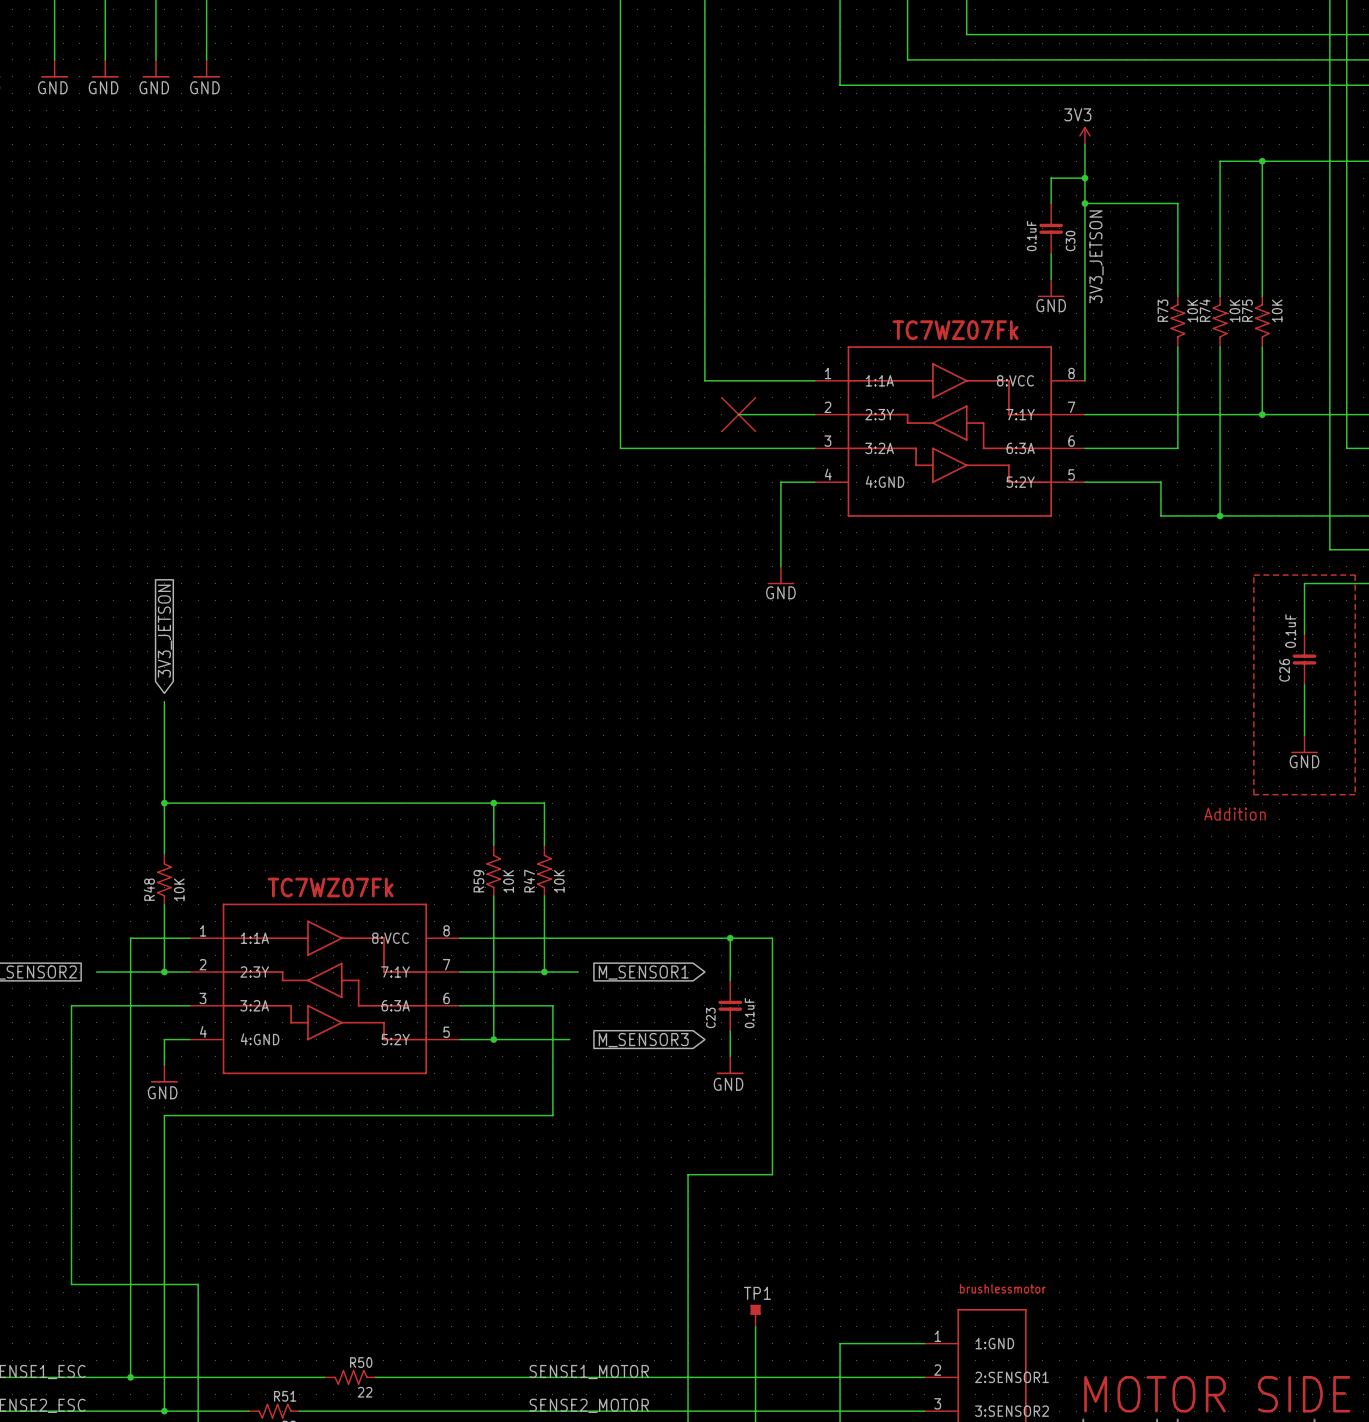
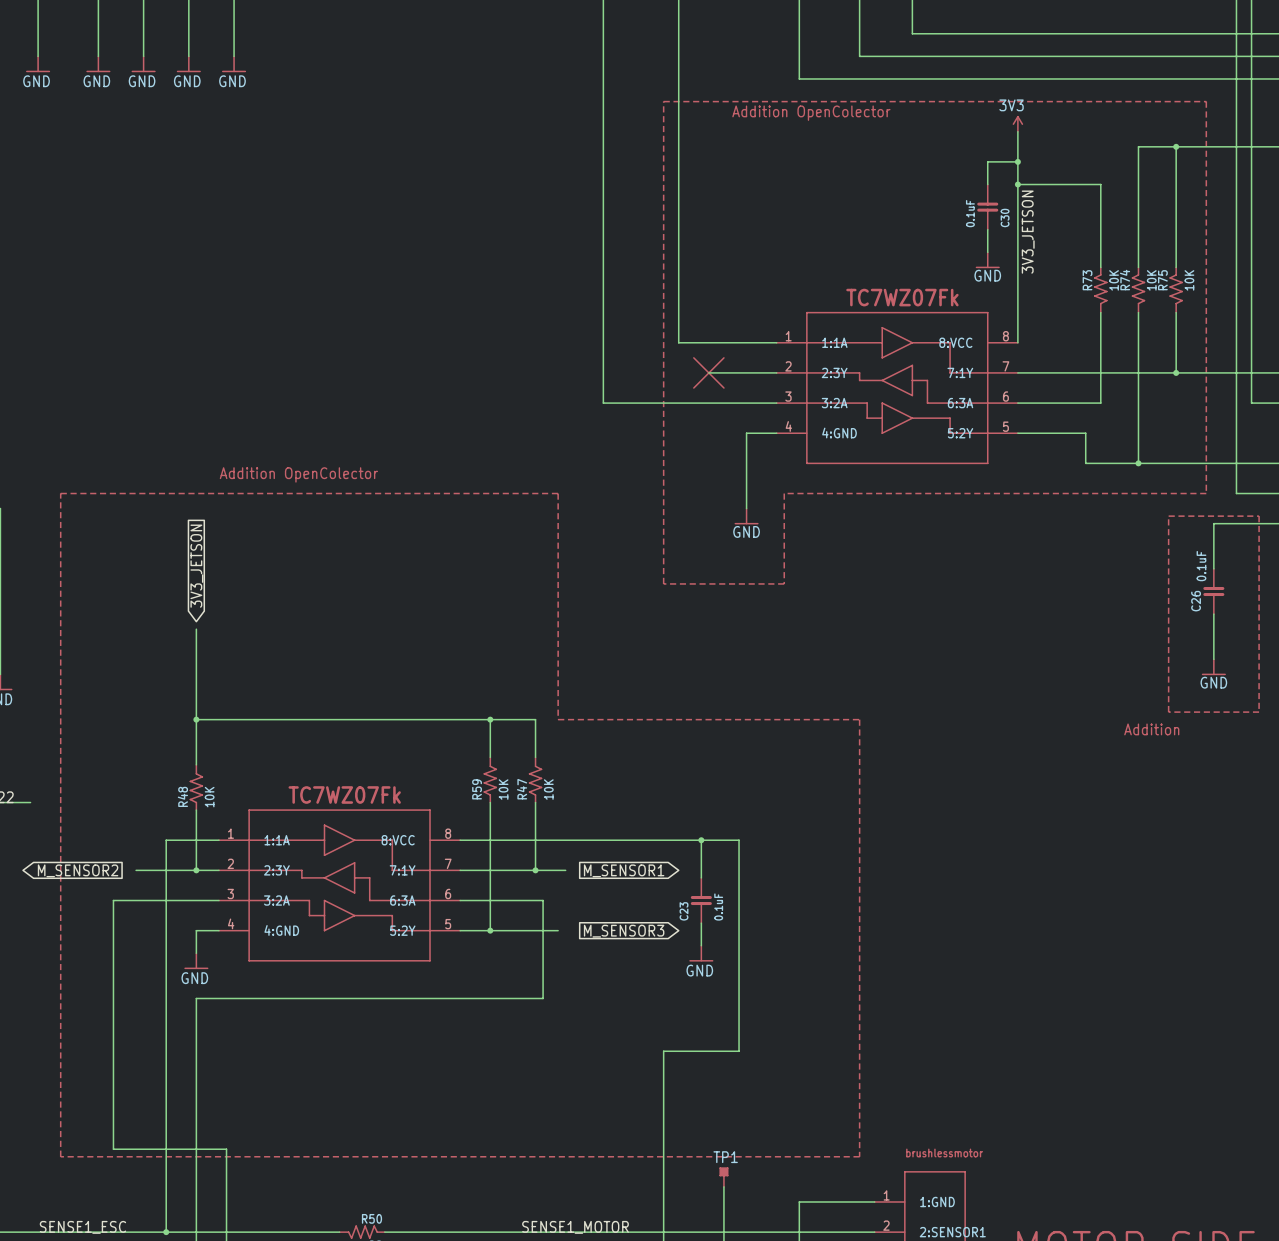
line: none -> (663, 101) (663, 583) (784, 583) (784, 493) (1206, 493) (1206, 101) (663, 101)
text: none -> Addition OpenColector (811, 113)
text: none -> Addition OpenColector (298, 474)
line: none -> (60, 493) (60, 1156) (859, 1156) (859, 719) (558, 719) (558, 493) (60, 493)

